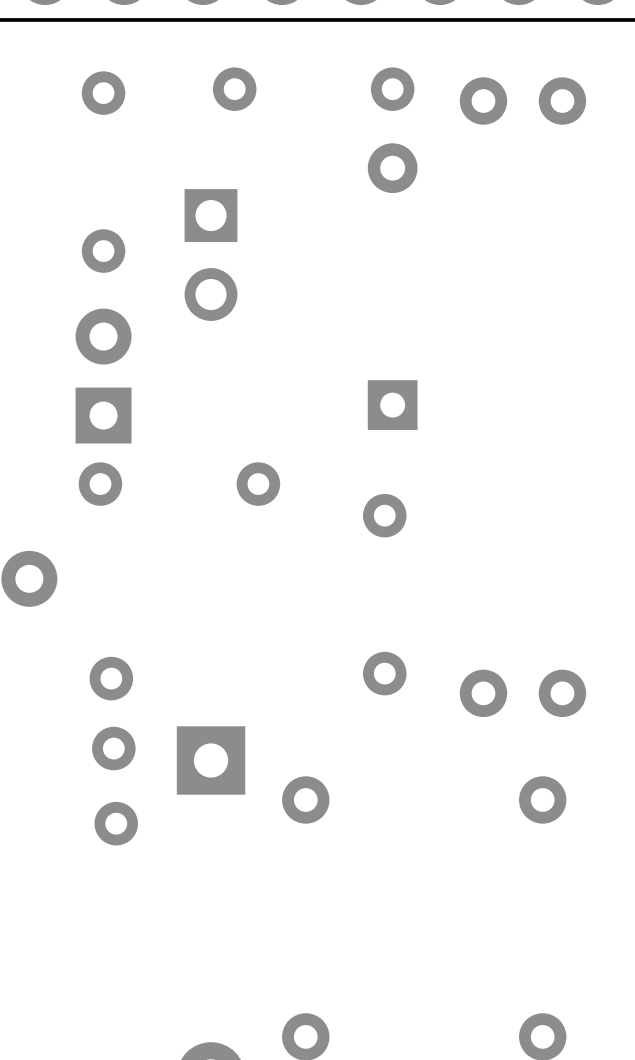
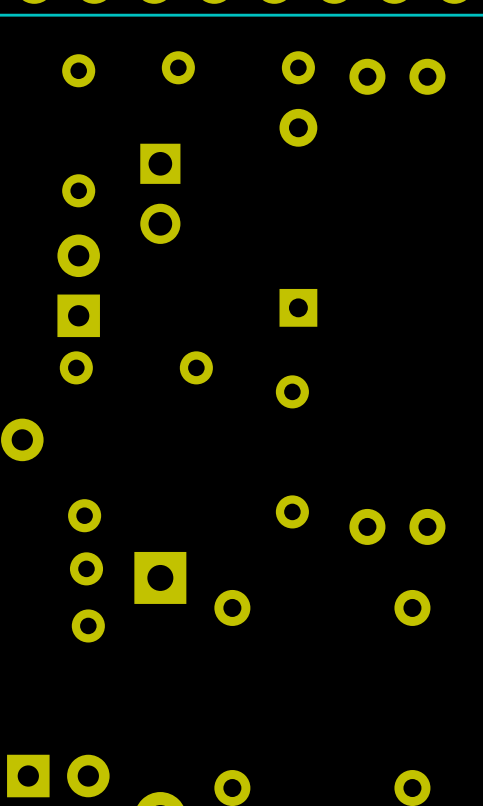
part: none -> (58, 776)

